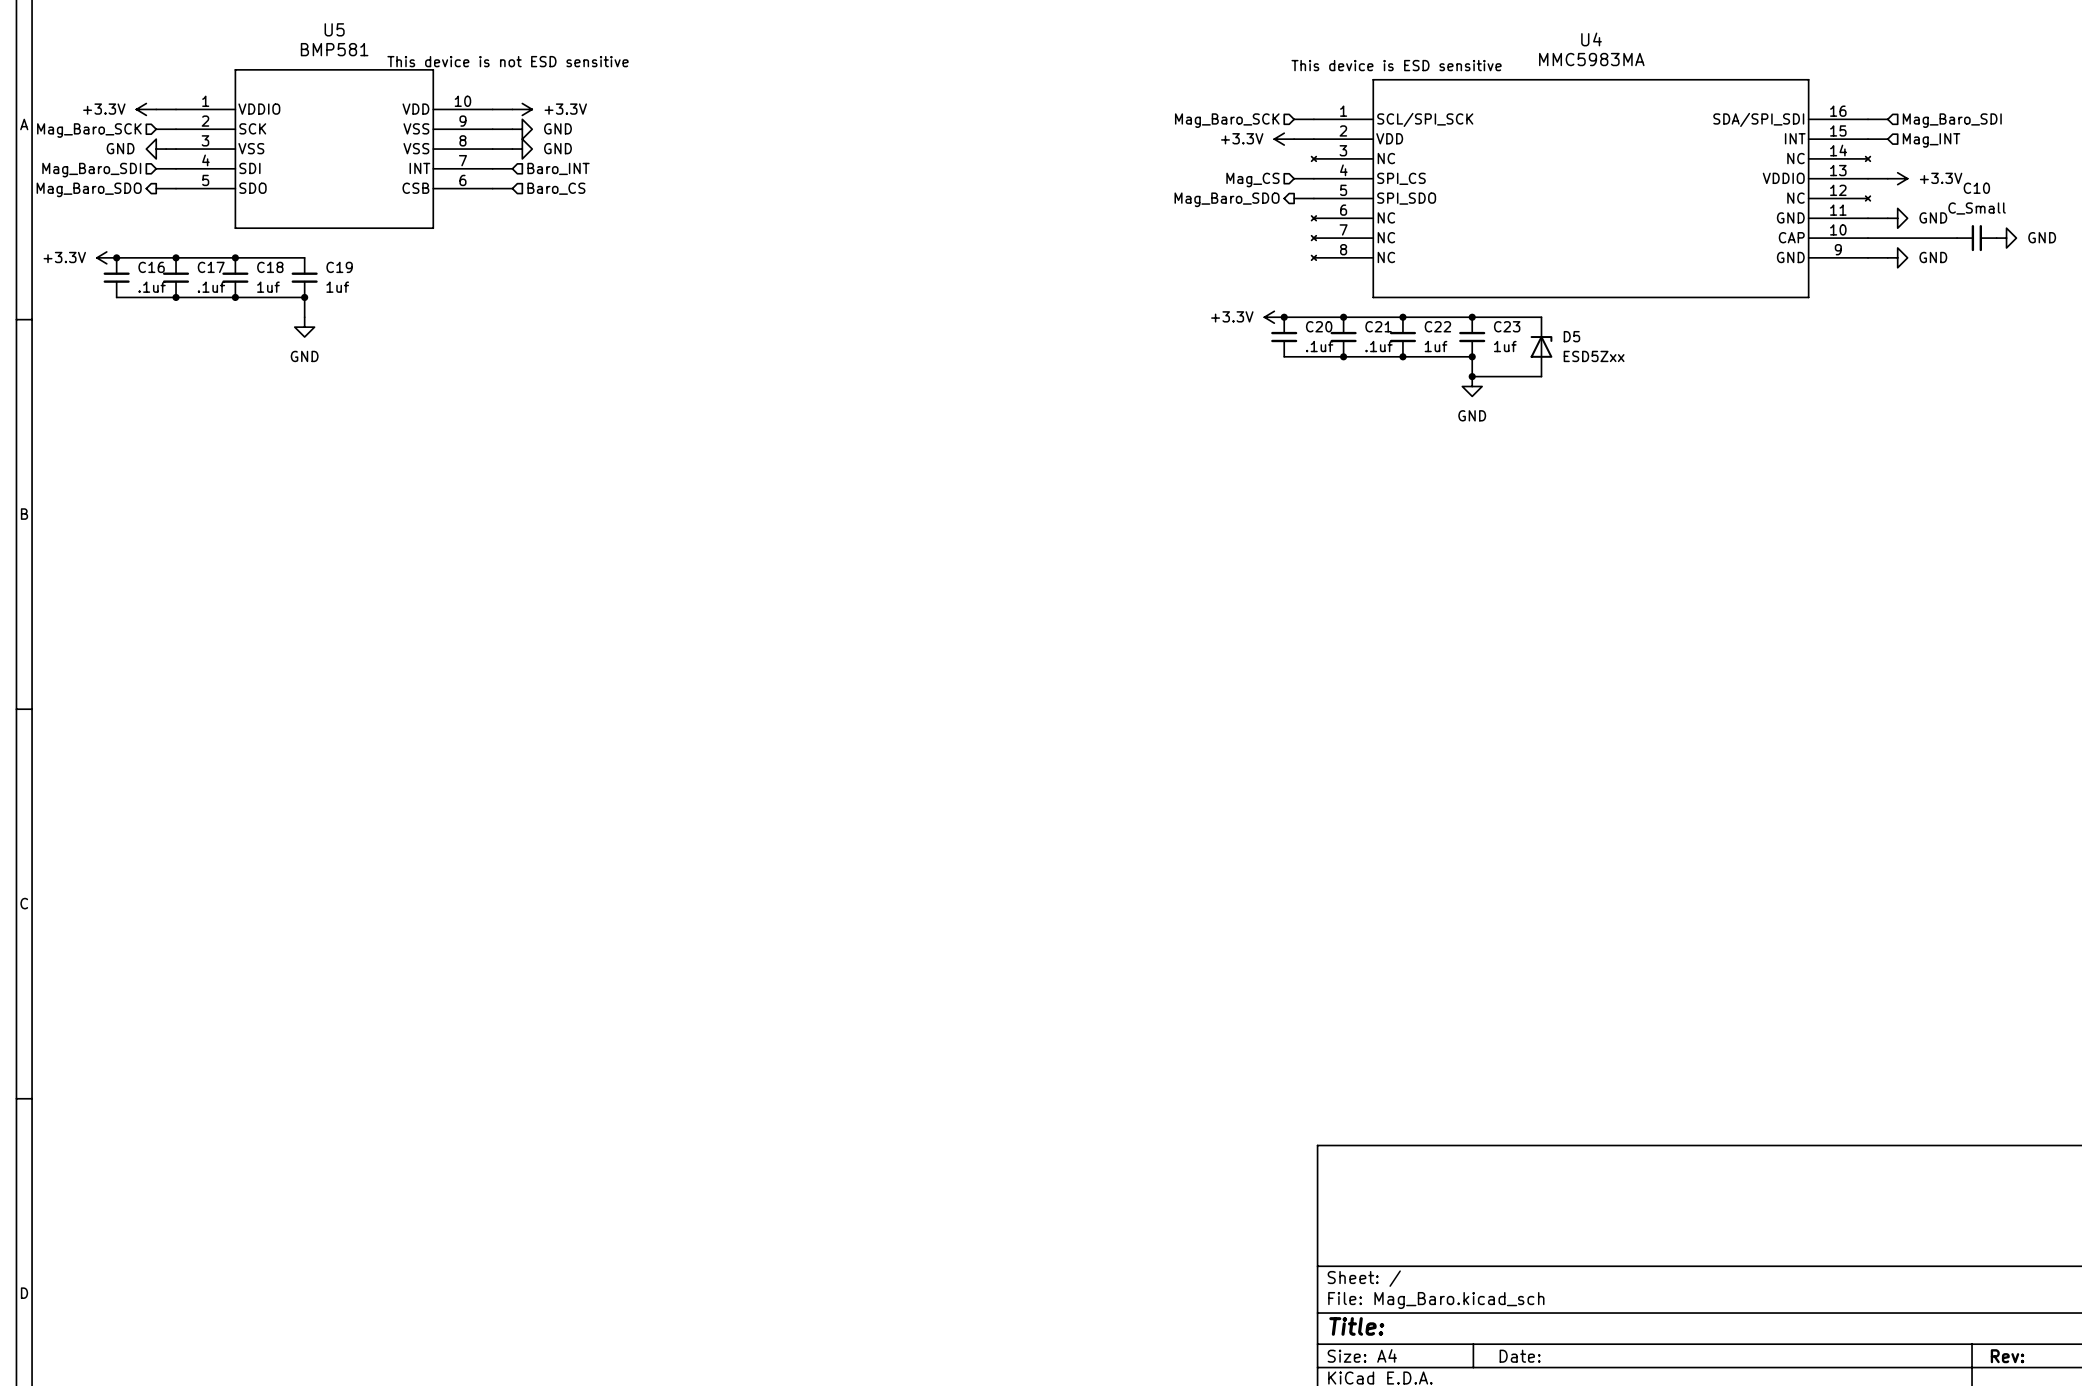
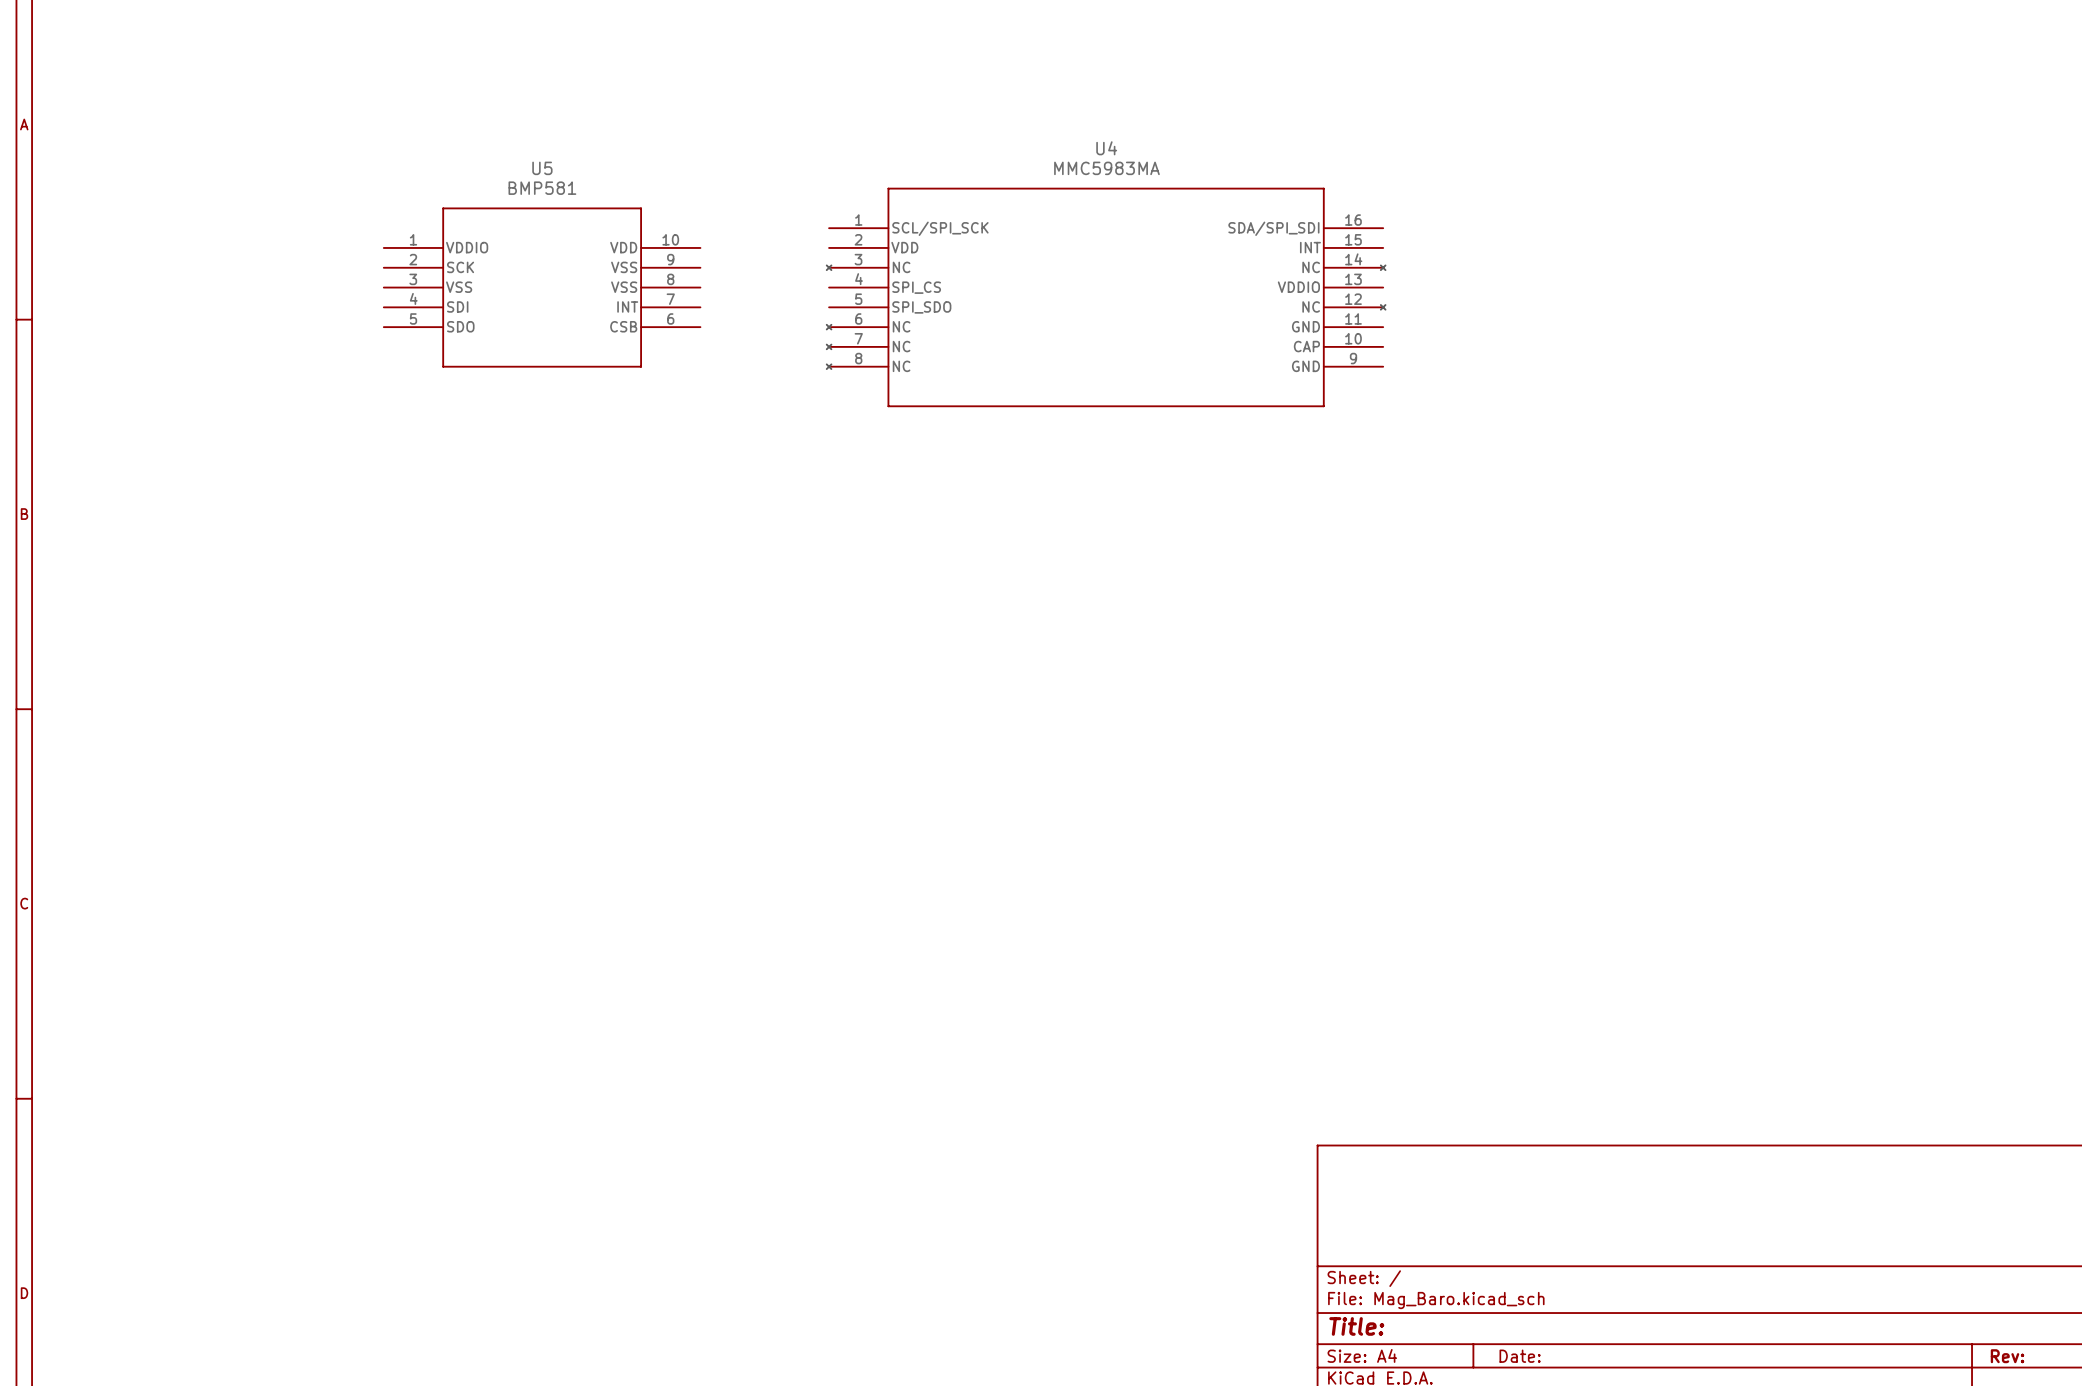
text: This device is not ESD sensitive (508, 61) -> none
text: This device is ESD sensitive (1396, 65) -> none
power symbol: +3.3V (146, 109) -> none
wire: (156, 109) (176, 109) -> none
wire: (492, 109) (512, 109) -> none
power symbol: +3.3V (522, 109) -> none
wire: (1294, 119) (1313, 119) -> none
wire: (1868, 119) (1887, 119) -> none
hierarchical label: Mag_Baro_SCK (1227, 120) -> none
hierarchical label: Mag_Baro_SDI (1952, 120) -> none
wire: (156, 129) (176, 129) -> none
wire: (492, 129) (512, 129) -> none
power symbol: GND (522, 129) -> none
hierarchical label: Mag_Baro_SCK (89, 130) -> none
power symbol: +3.3V (1284, 139) -> none
wire: (1294, 139) (1313, 139) -> none
wire: (1868, 139) (1887, 139) -> none
hierarchical label: Mag_INT (1931, 140) -> none
power symbol: GND (156, 149) -> none
wire: (166, 149) (176, 149) -> none
U5 position: (334, 149) -> (542, 287)
wire: (492, 149) (512, 149) -> none
power symbol: GND (522, 149) -> none
wire: (156, 168) (176, 168) -> none
wire: (492, 168) (512, 168) -> none
hierarchical label: Baro_INT (558, 168) -> none
hierarchical label: Mag_Baro_SDI (91, 170) -> none
wire: (1294, 178) (1313, 178) -> none
wire: (1868, 178) (1887, 178) -> none
power symbol: +3.3V (1897, 178) -> none
hierarchical label: Mag_CS (1252, 179) -> none
wire: (156, 188) (176, 188) -> none
wire: (492, 188) (512, 188) -> none
hierarchical label: Baro_CS (556, 188) -> none
U4 position: (1590, 188) -> (1106, 297)
hierarchical label: Mag_Baro_SDO (89, 189) -> none
wire: (1294, 198) (1313, 198) -> none
hierarchical label: Mag_Baro_SDO (1227, 199) -> none
wire: (1868, 218) (1887, 218) -> none
power symbol: GND (1897, 218) -> none
wire: (1868, 238) (1957, 238) -> none
C10: C_Small (1976, 238) -> none
power symbol: GND (2006, 238) -> none
power symbol: +3.3V (106, 257) -> none
wire: (116, 257) (304, 257) -> none
junction: (116, 257) -> none
junction: (176, 257) -> none
junction: (235, 257) -> none
wire: (1868, 257) (1887, 257) -> none
power symbol: GND (1897, 257) -> none
C16: .1uf (116, 277) -> none
C17: .1uf (176, 277) -> none
C18: 1uf (235, 277) -> none
C19: 1uf (304, 277) -> none
wire: (116, 297) (304, 297) (304, 317) -> none
junction: (176, 297) -> none
junction: (235, 297) -> none
junction: (304, 297) -> none
power symbol: +3.3V (1274, 317) -> none
wire: (1284, 317) (1541, 317) -> none
junction: (1284, 317) -> none
junction: (1343, 317) -> none
junction: (1402, 317) -> none
junction: (1472, 317) -> none
power symbol: GND (304, 327) -> none
C20: .1uf (1284, 337) -> none
C21: .1uf (1343, 337) -> none
C22: 1uf (1402, 337) -> none
C23: 1uf (1472, 337) -> none
D5: ESD5Zxx (1541, 346) -> none
wire: (1284, 356) (1472, 356) (1472, 376) (1541, 376) -> none
junction: (1343, 356) -> none
junction: (1402, 356) -> none
junction: (1472, 356) -> none
junction: (1472, 376) -> none
power symbol: GND (1472, 386) -> none

